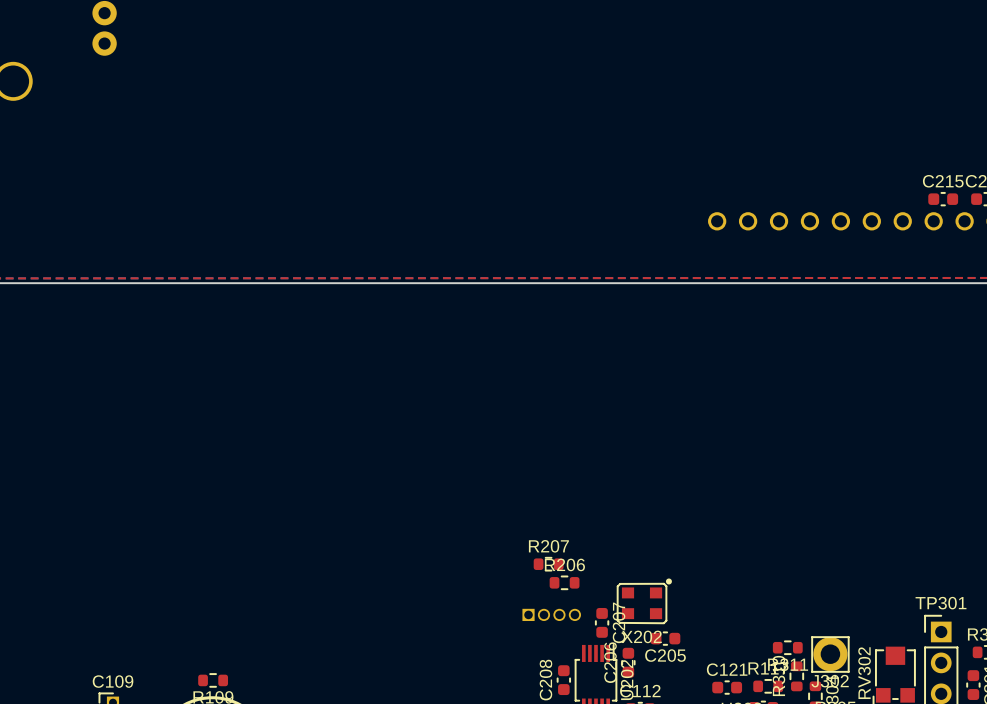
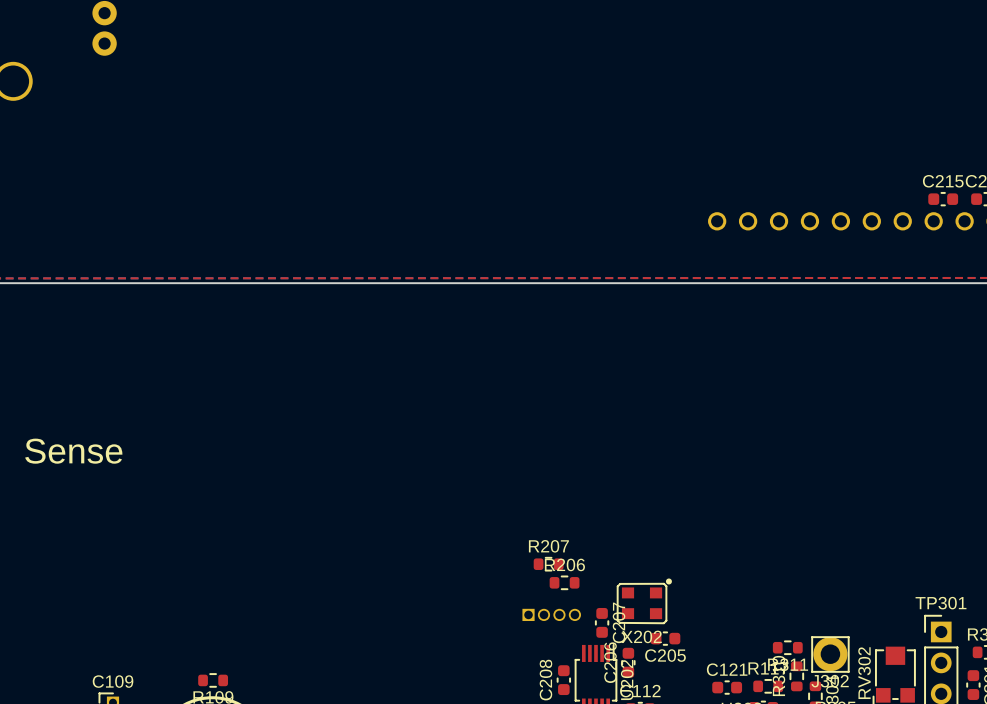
text: none -> Sense (73, 451)

